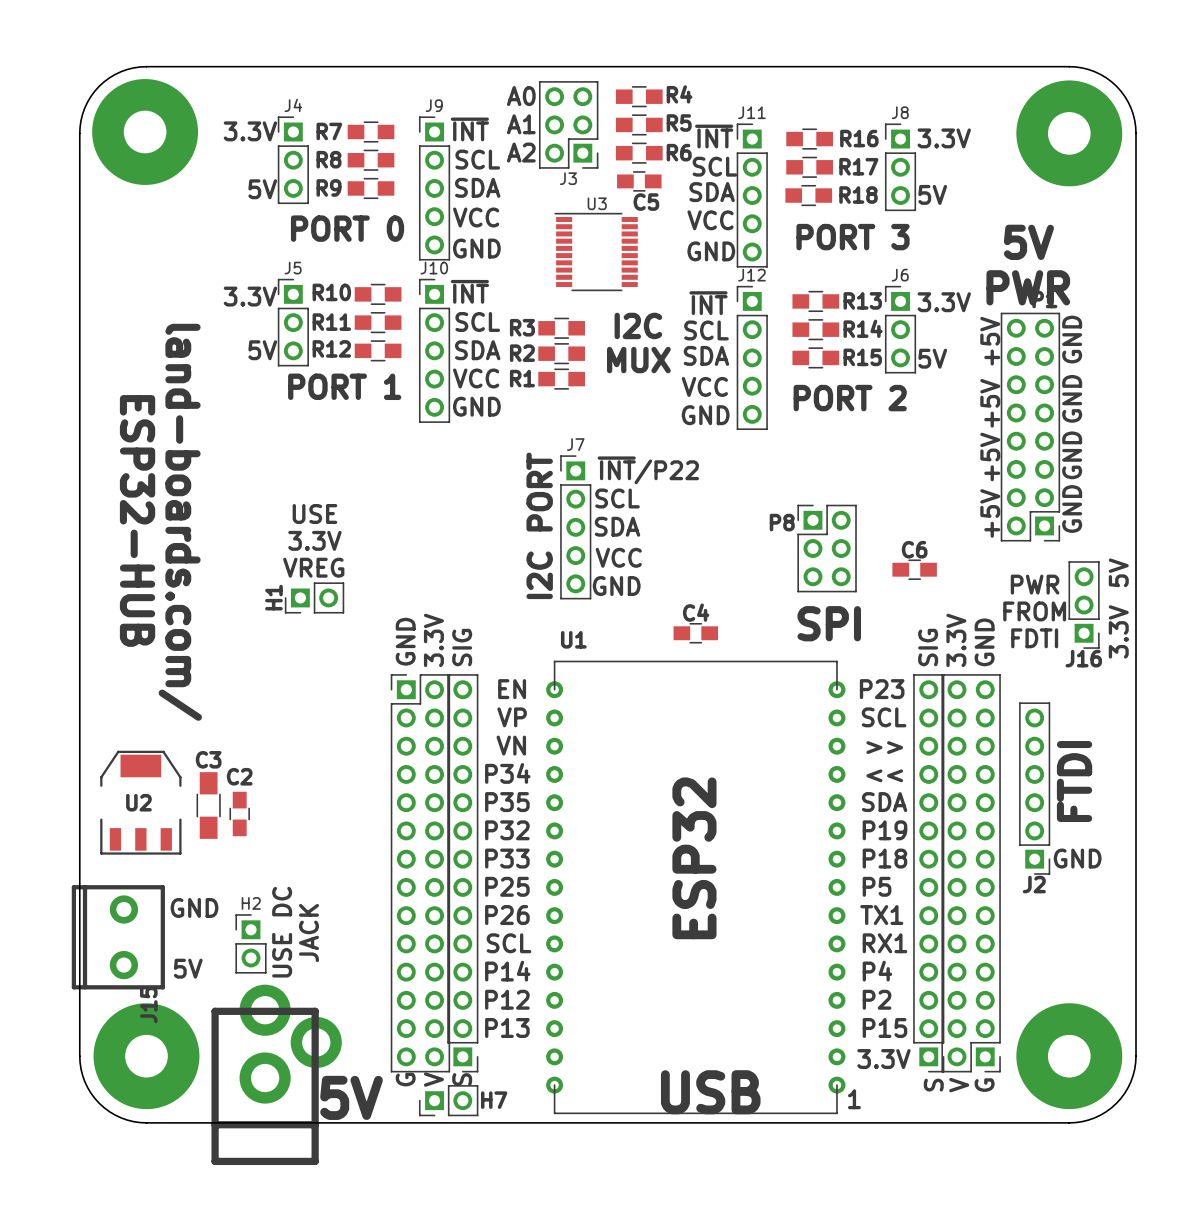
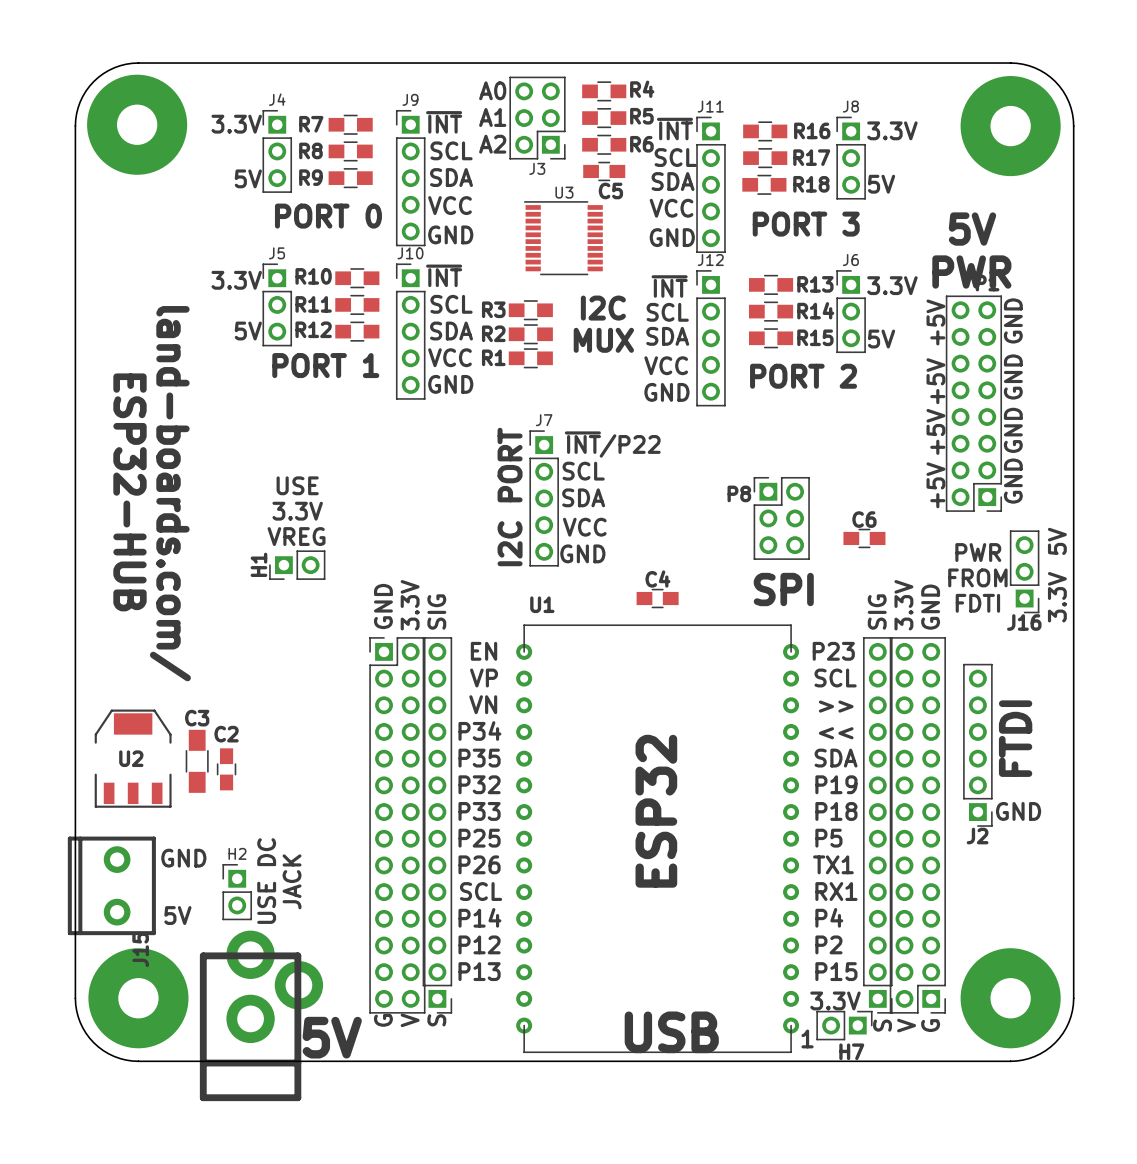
H7 rotation: 0° (448, 1100) -> 180° (844, 1025)
H7 position: (448, 1100) -> (844, 1025)
H7 name position: H7 (494, 1100) -> H7 (851, 1051)

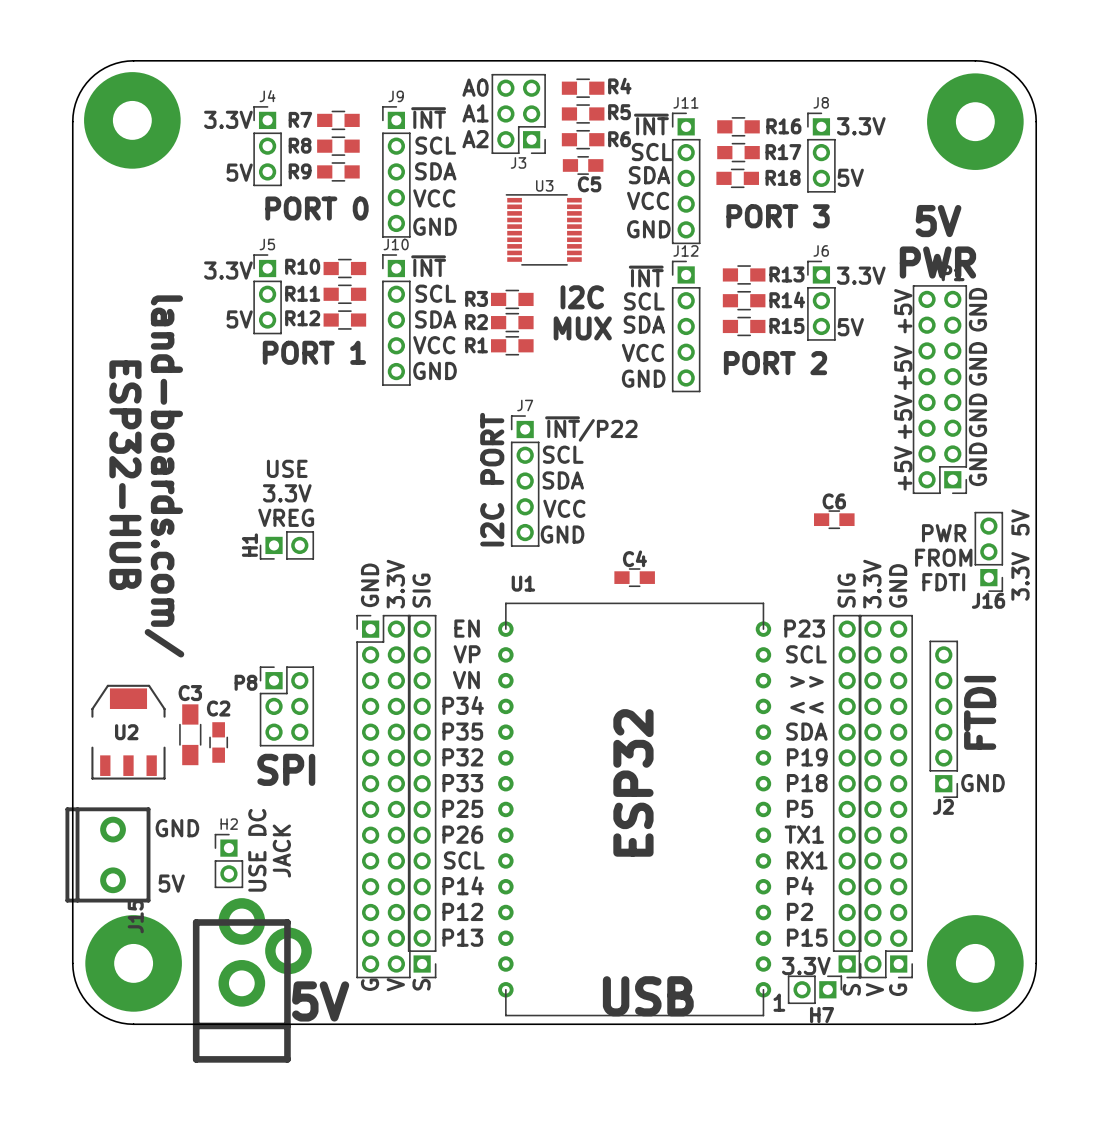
P8 position: (781, 518) -> (286, 706)
text: SPI (783, 589) -> none
text: none -> SPI (286, 769)

